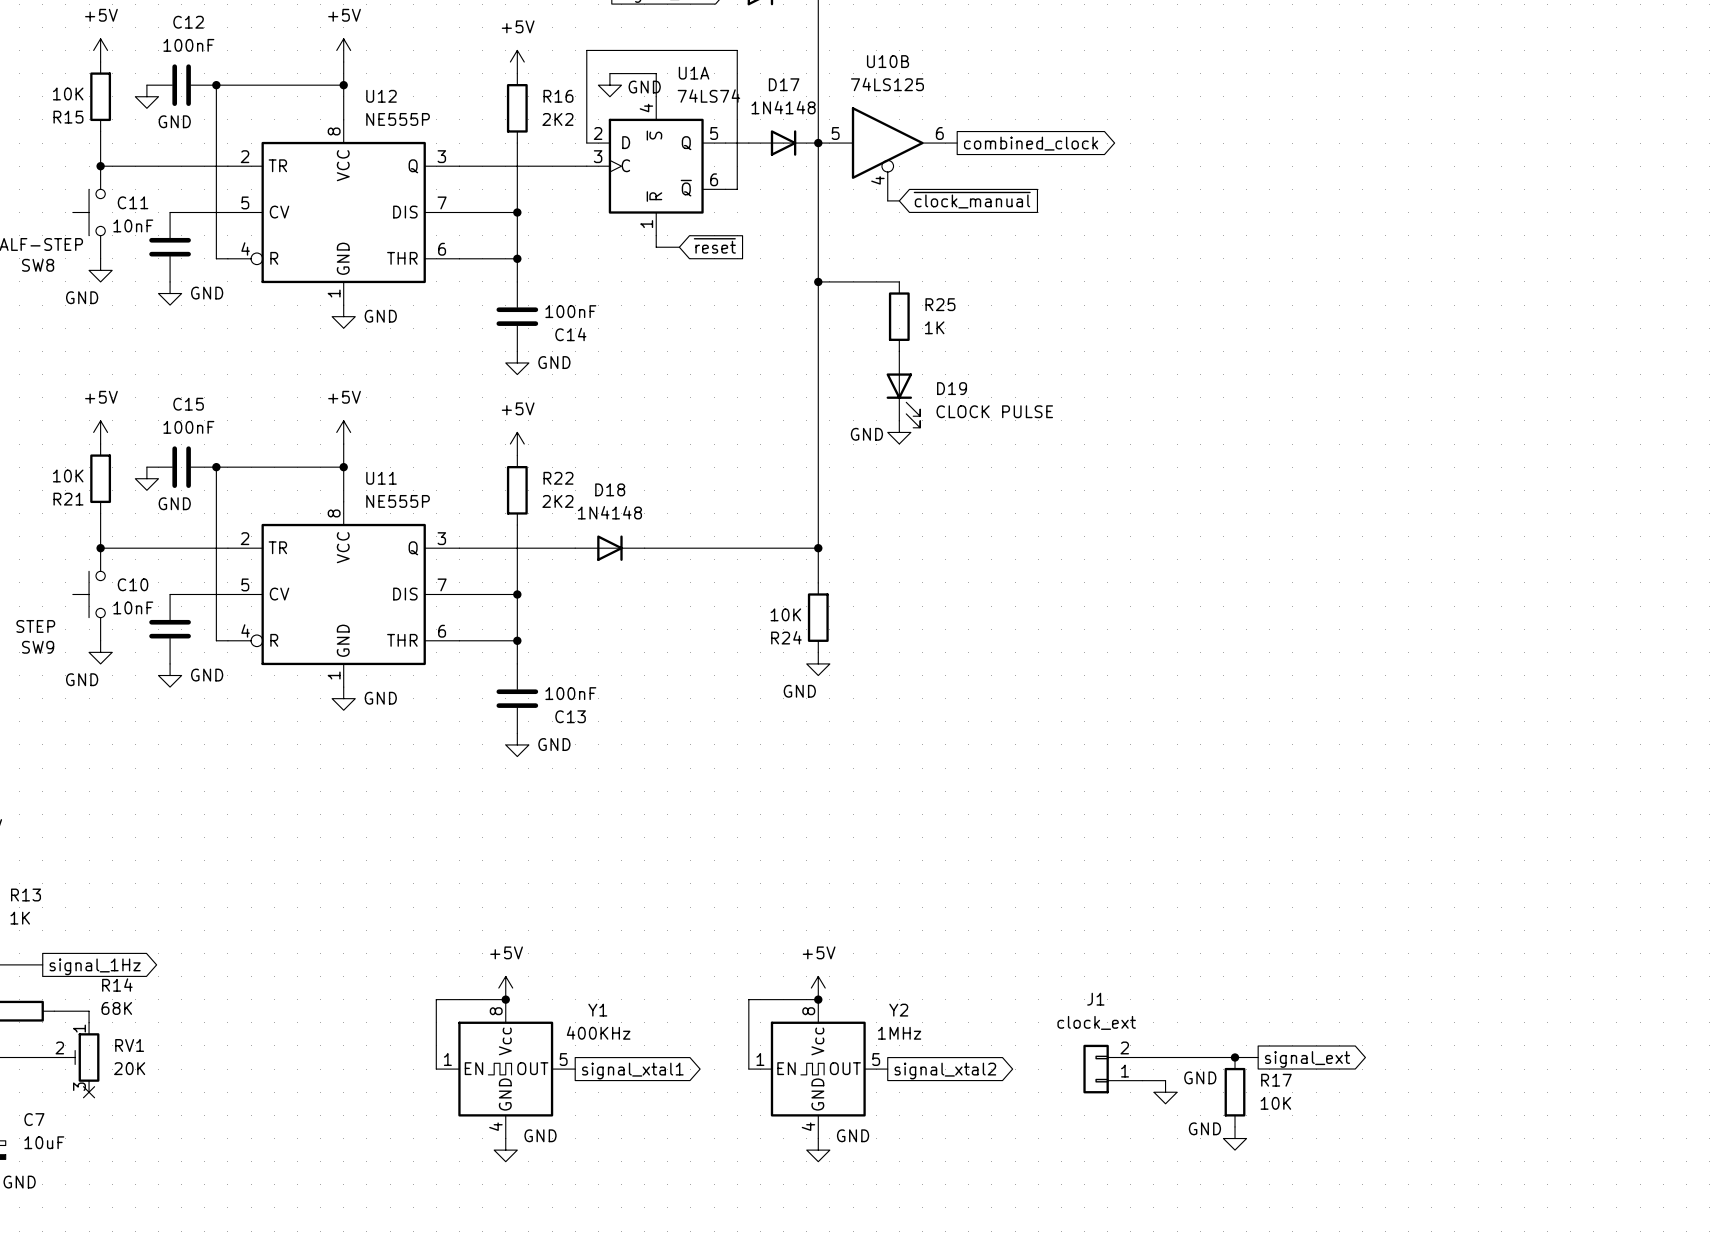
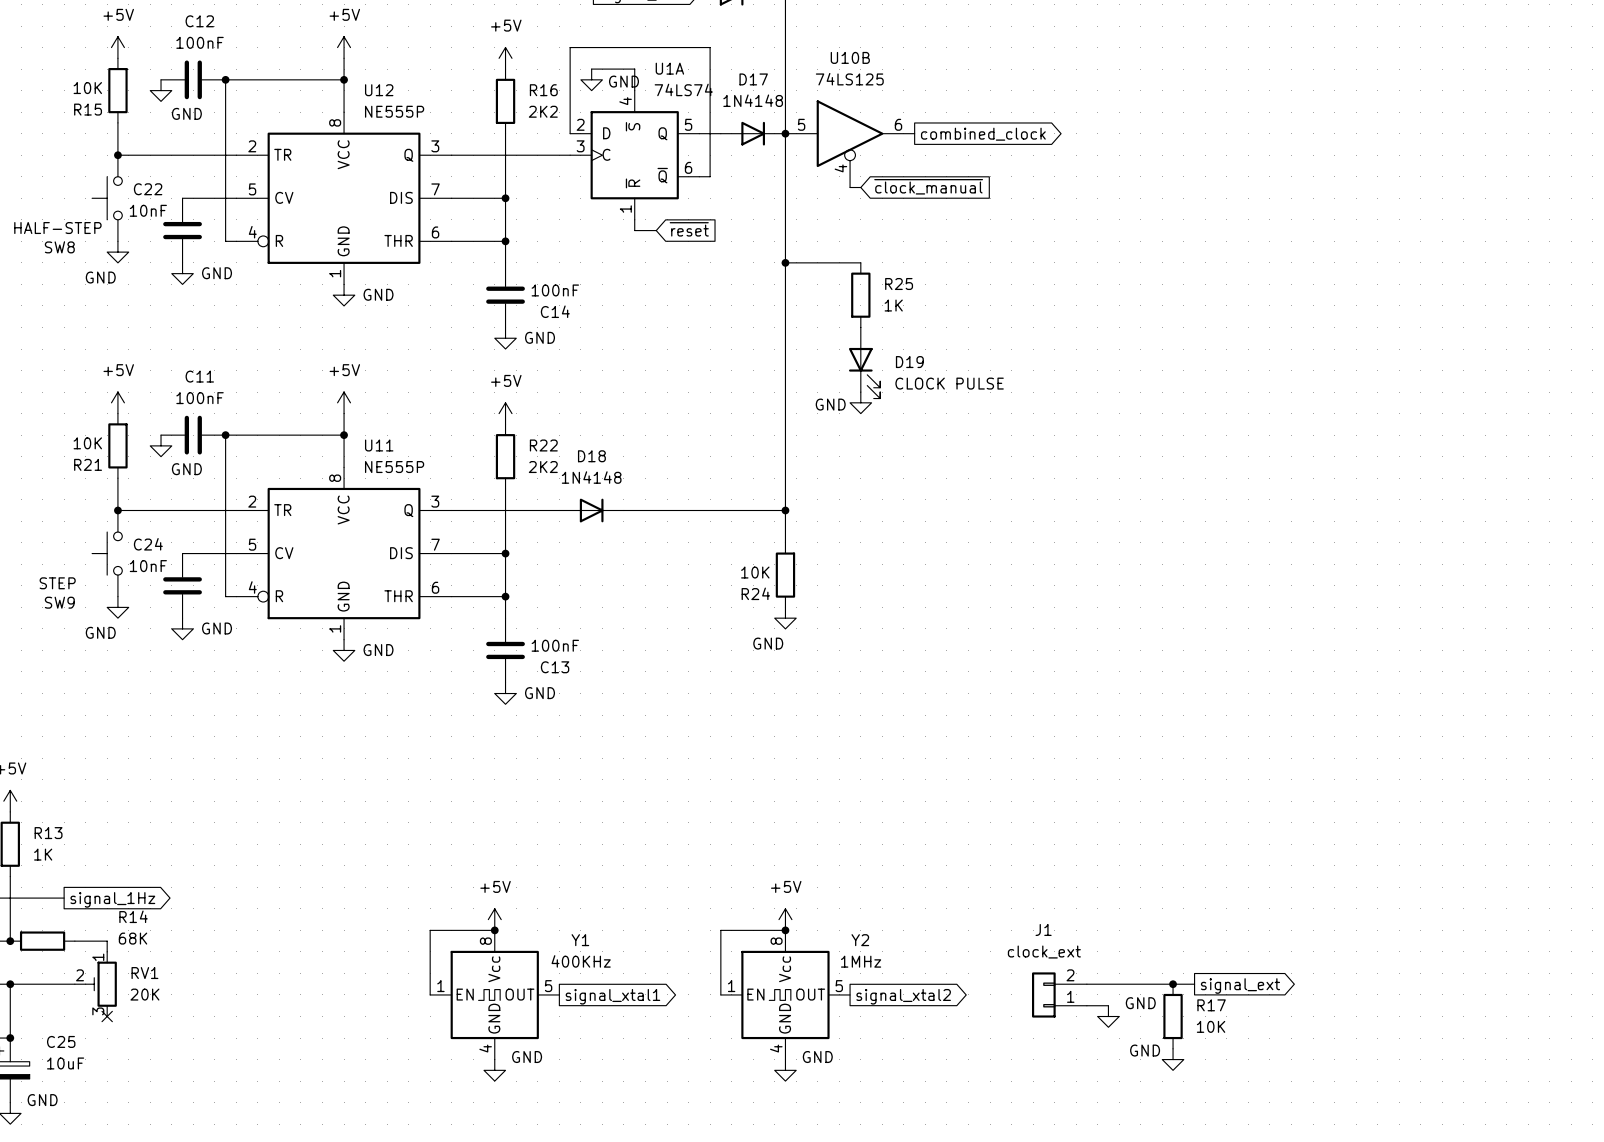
C11 name: C11 (133, 202) -> C22 (148, 189)
C15 name: C15 (188, 404) -> C11 (199, 376)
C10 name: C10 (133, 584) -> C24 (148, 544)
C7 name: C7 (34, 1119) -> C25 (61, 1041)

